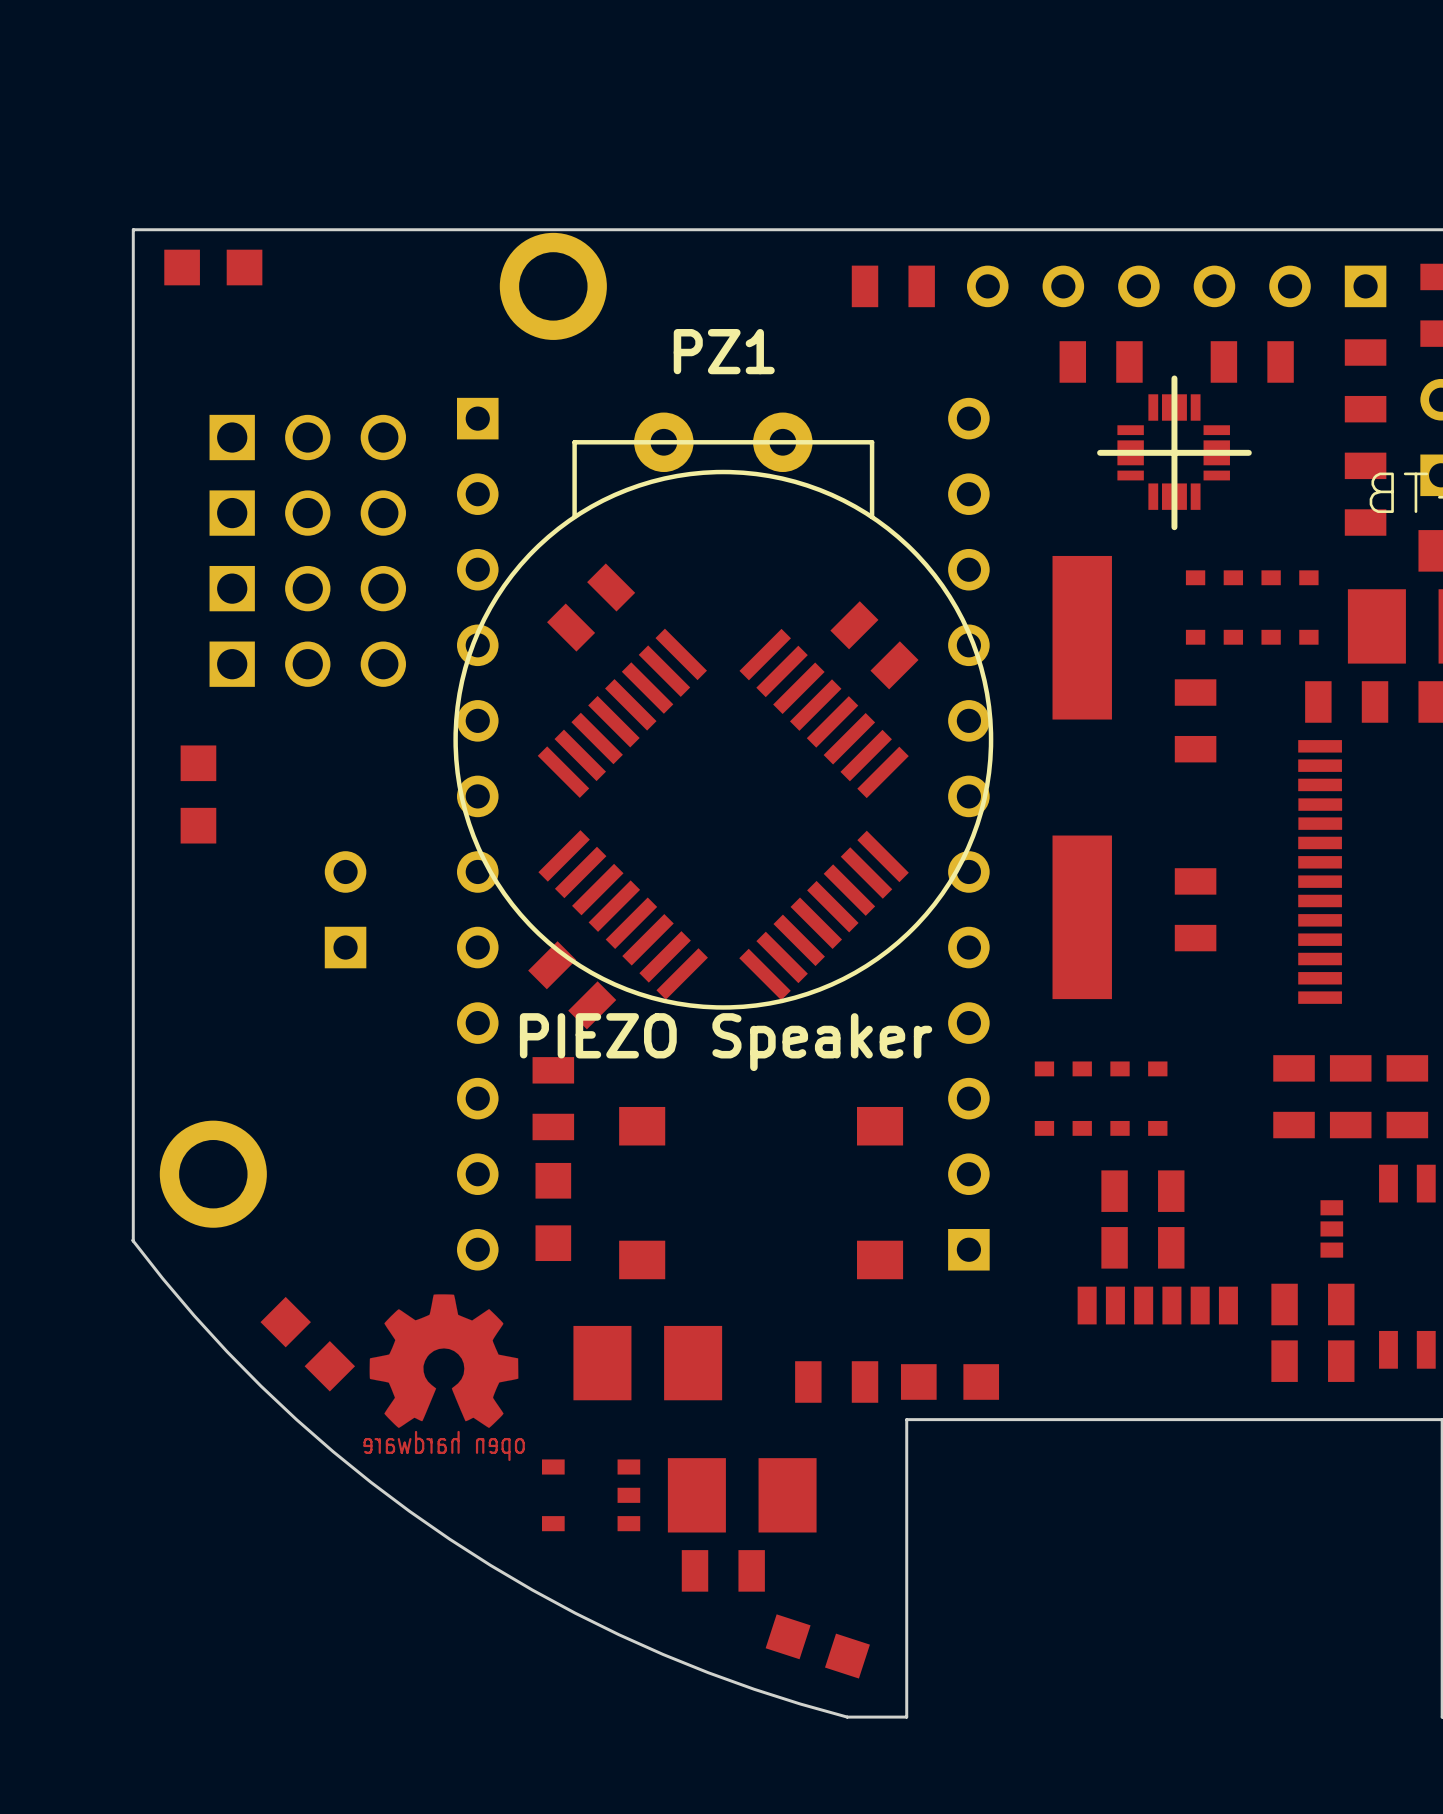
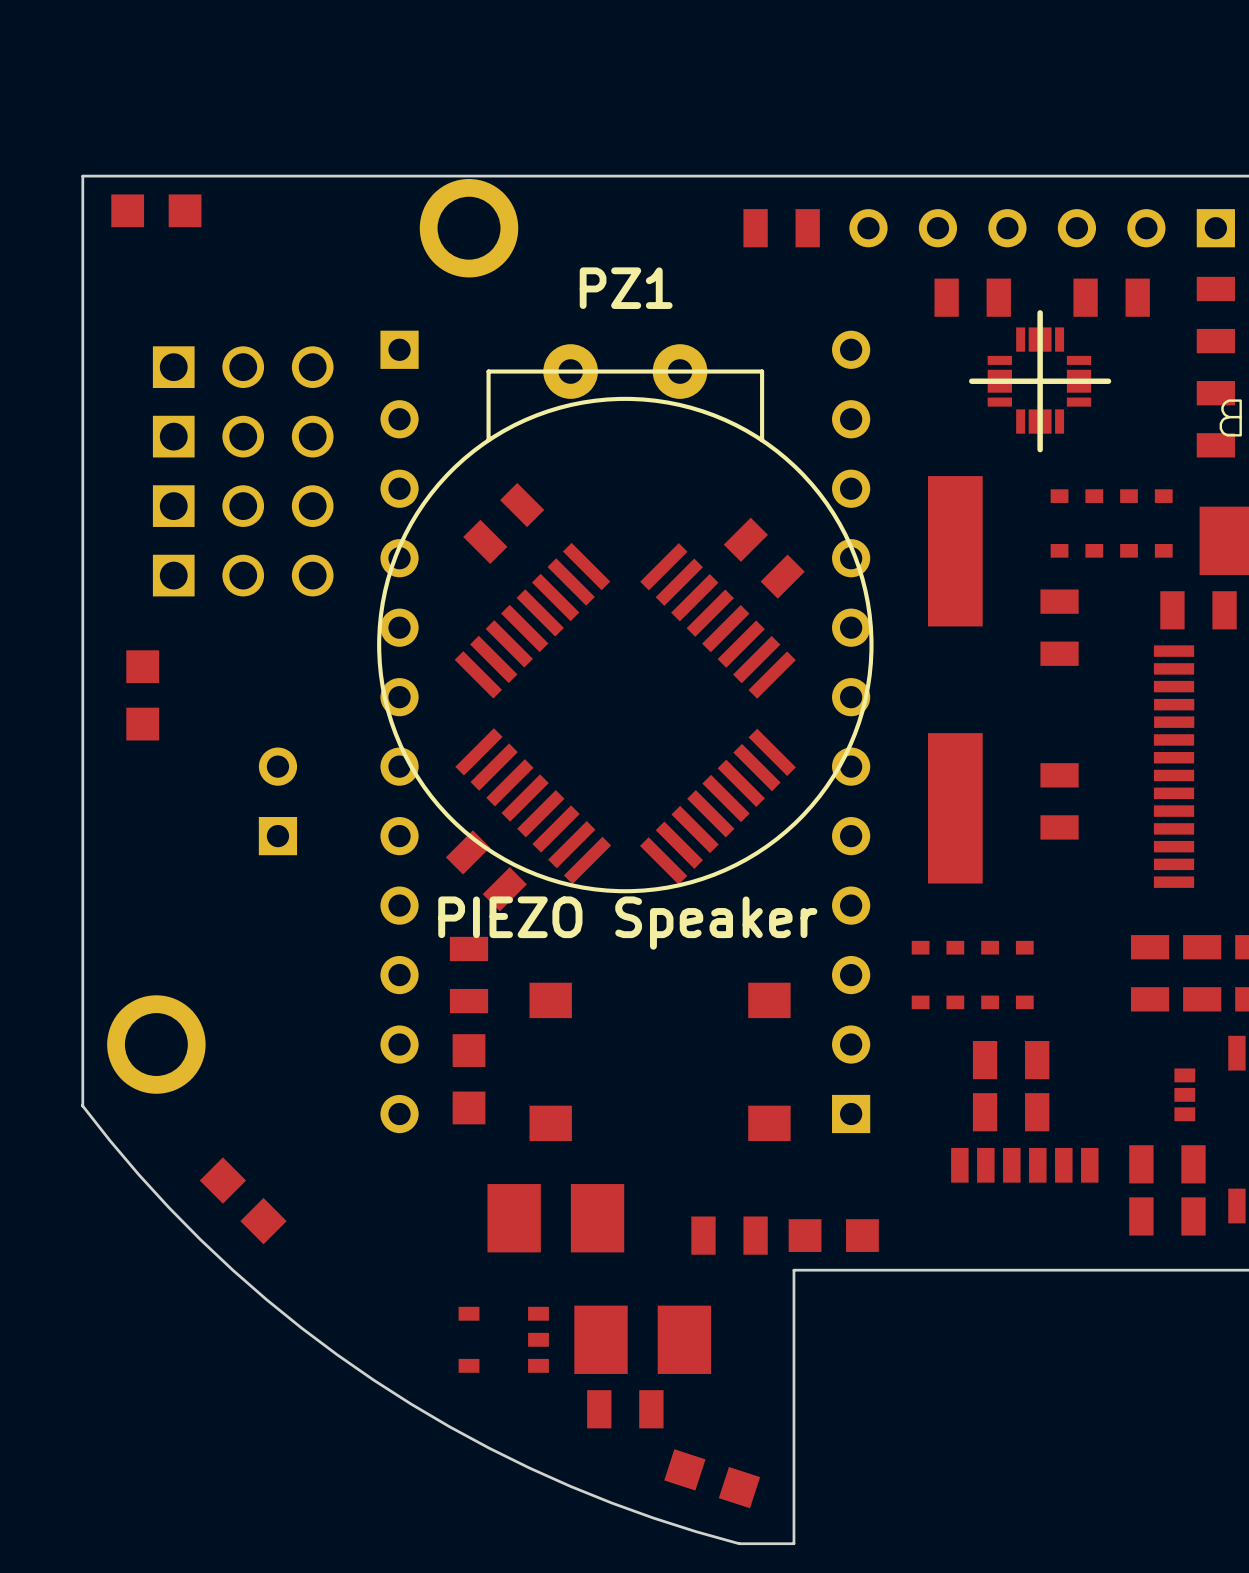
drawing: [363, 1294, 525, 1462] -> none

